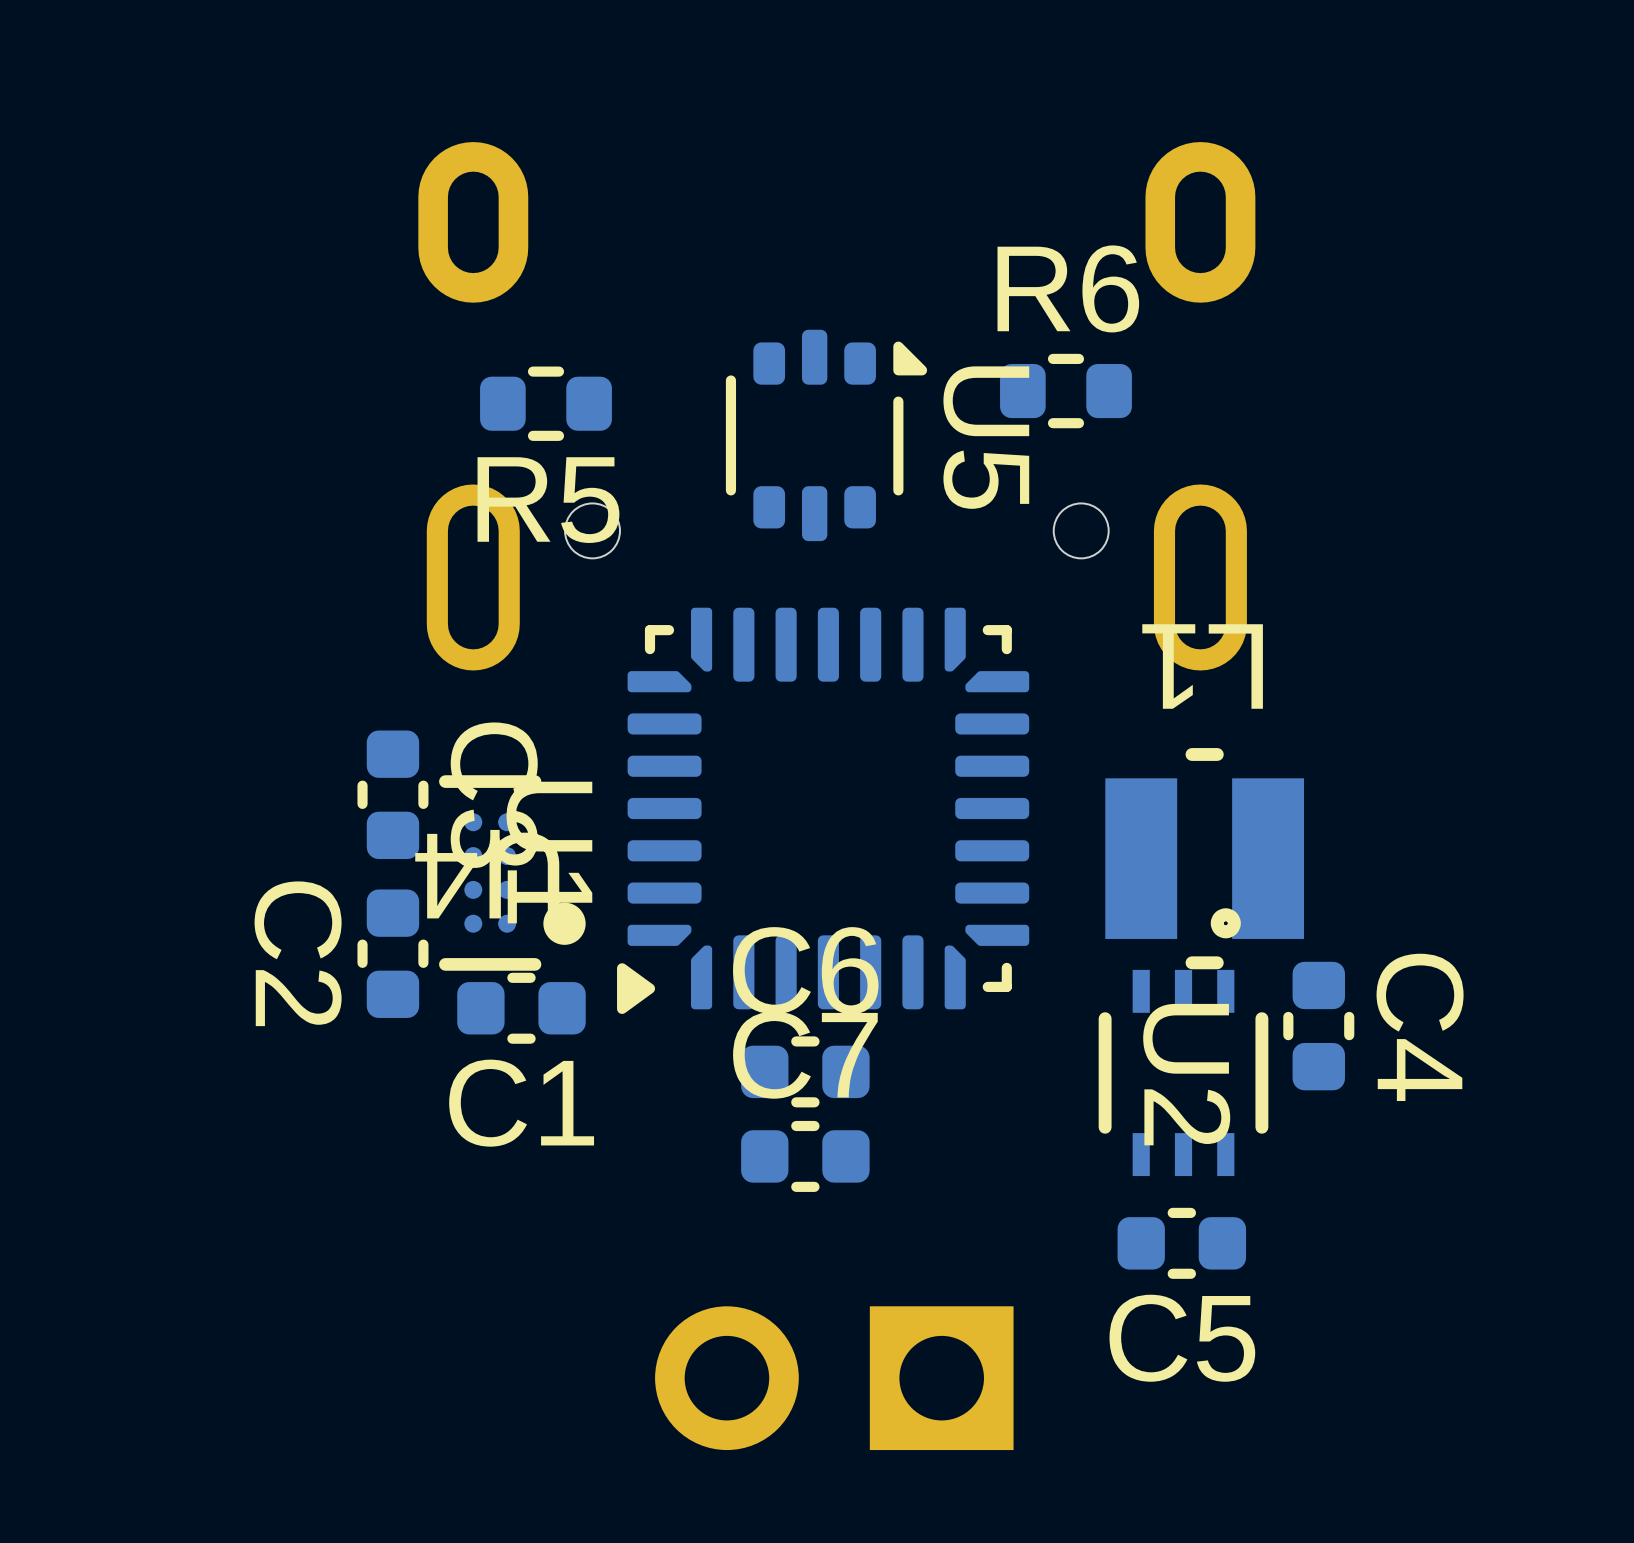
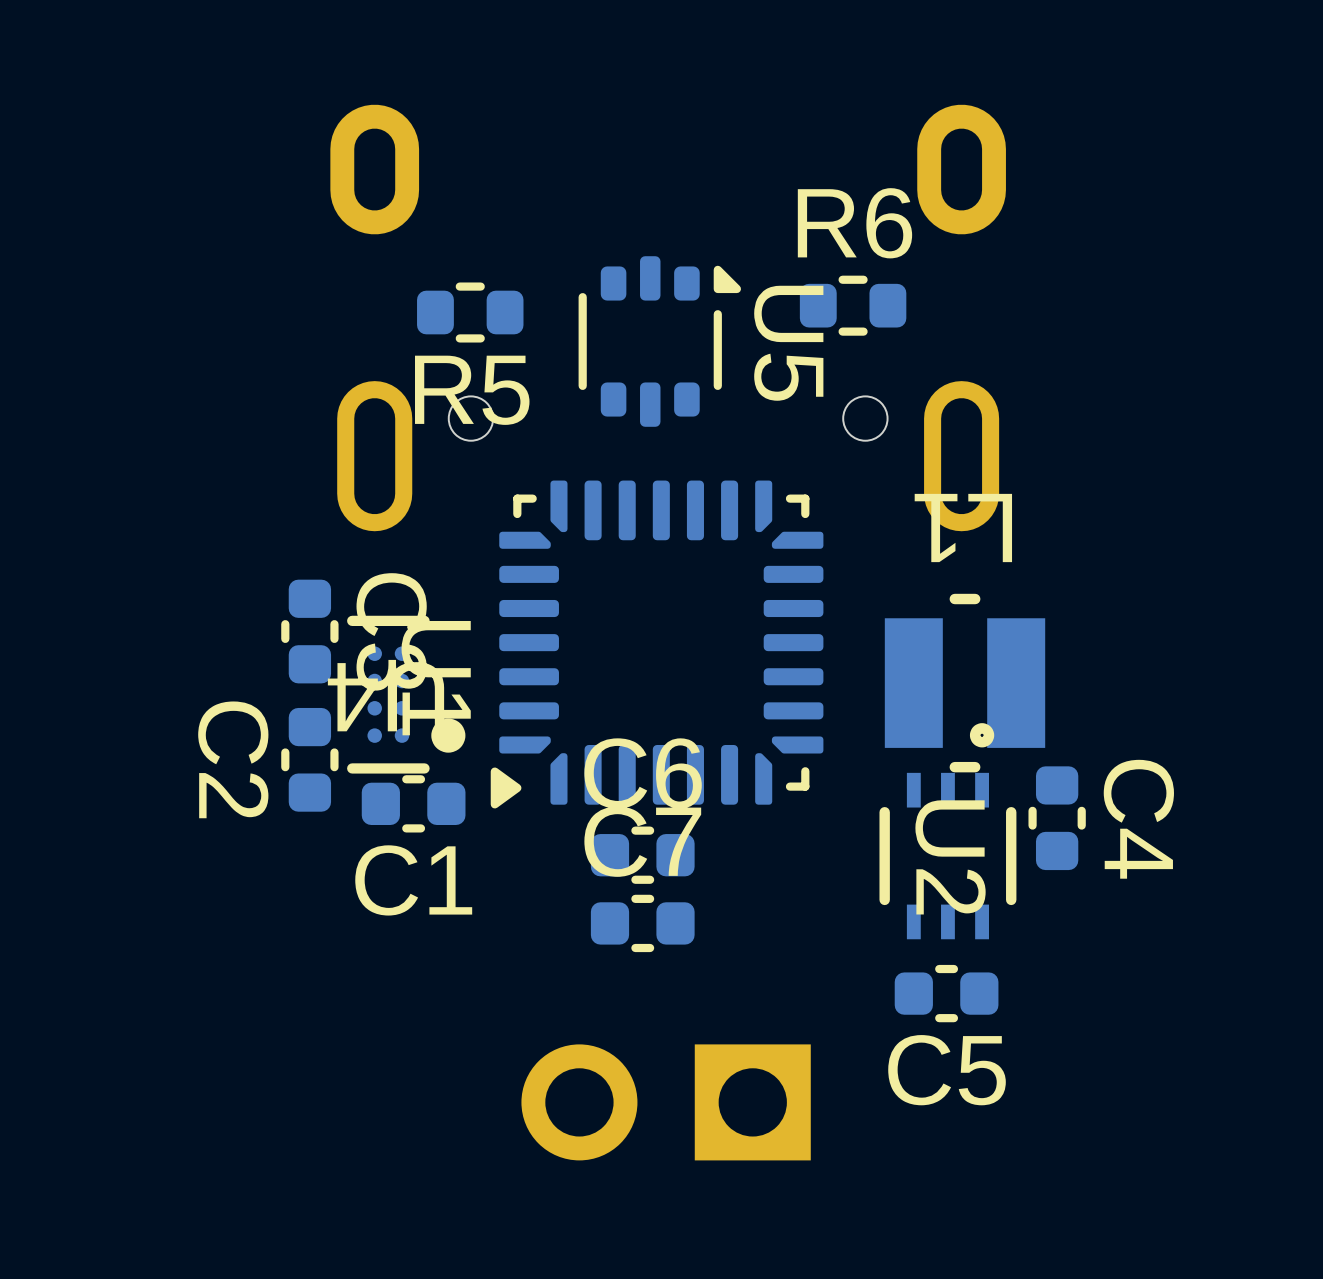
R5 position: (546, 403) -> (470, 312)

